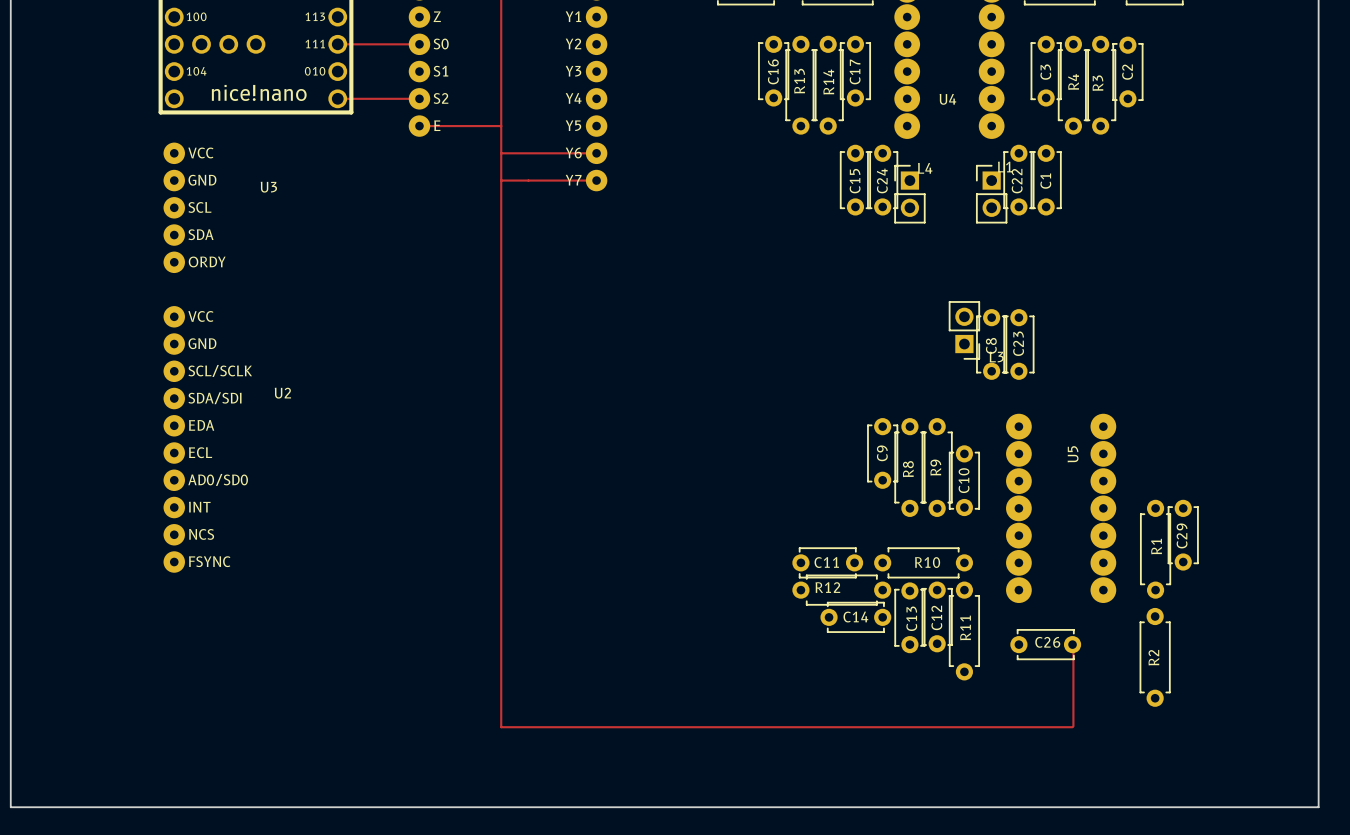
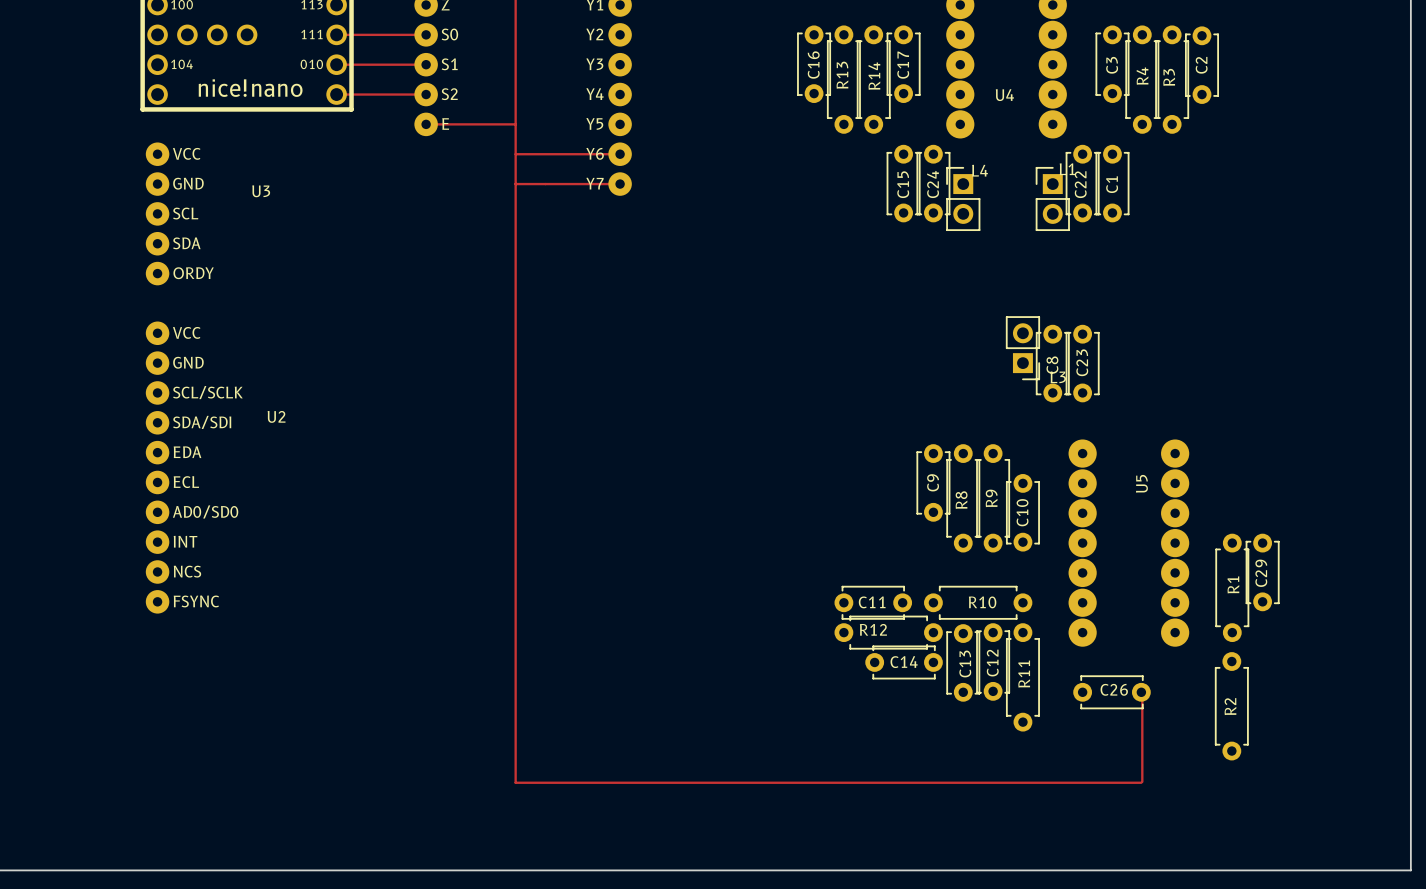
track: none -> (336, 64) (426, 64)

